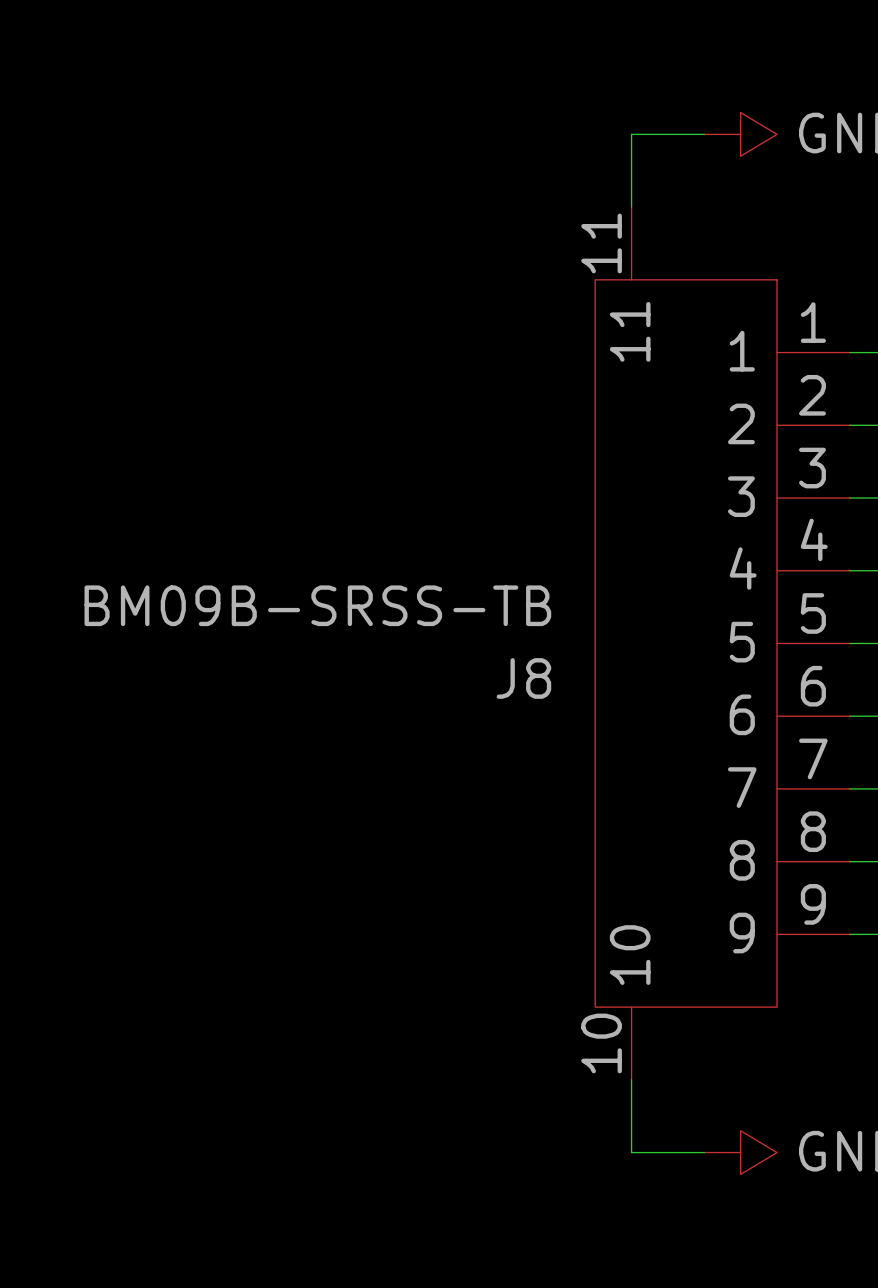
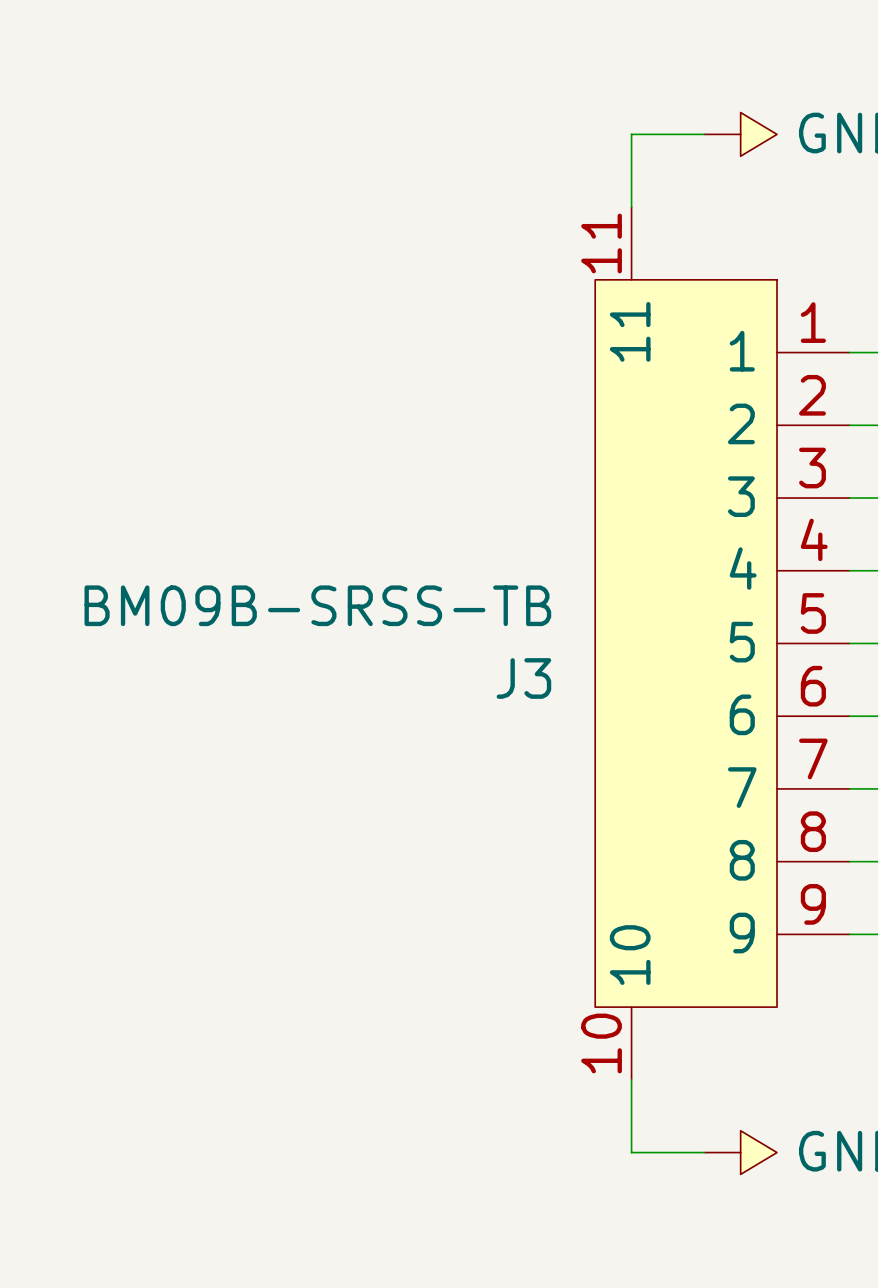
J8 name: J8 (523, 678) -> J3 (523, 678)

